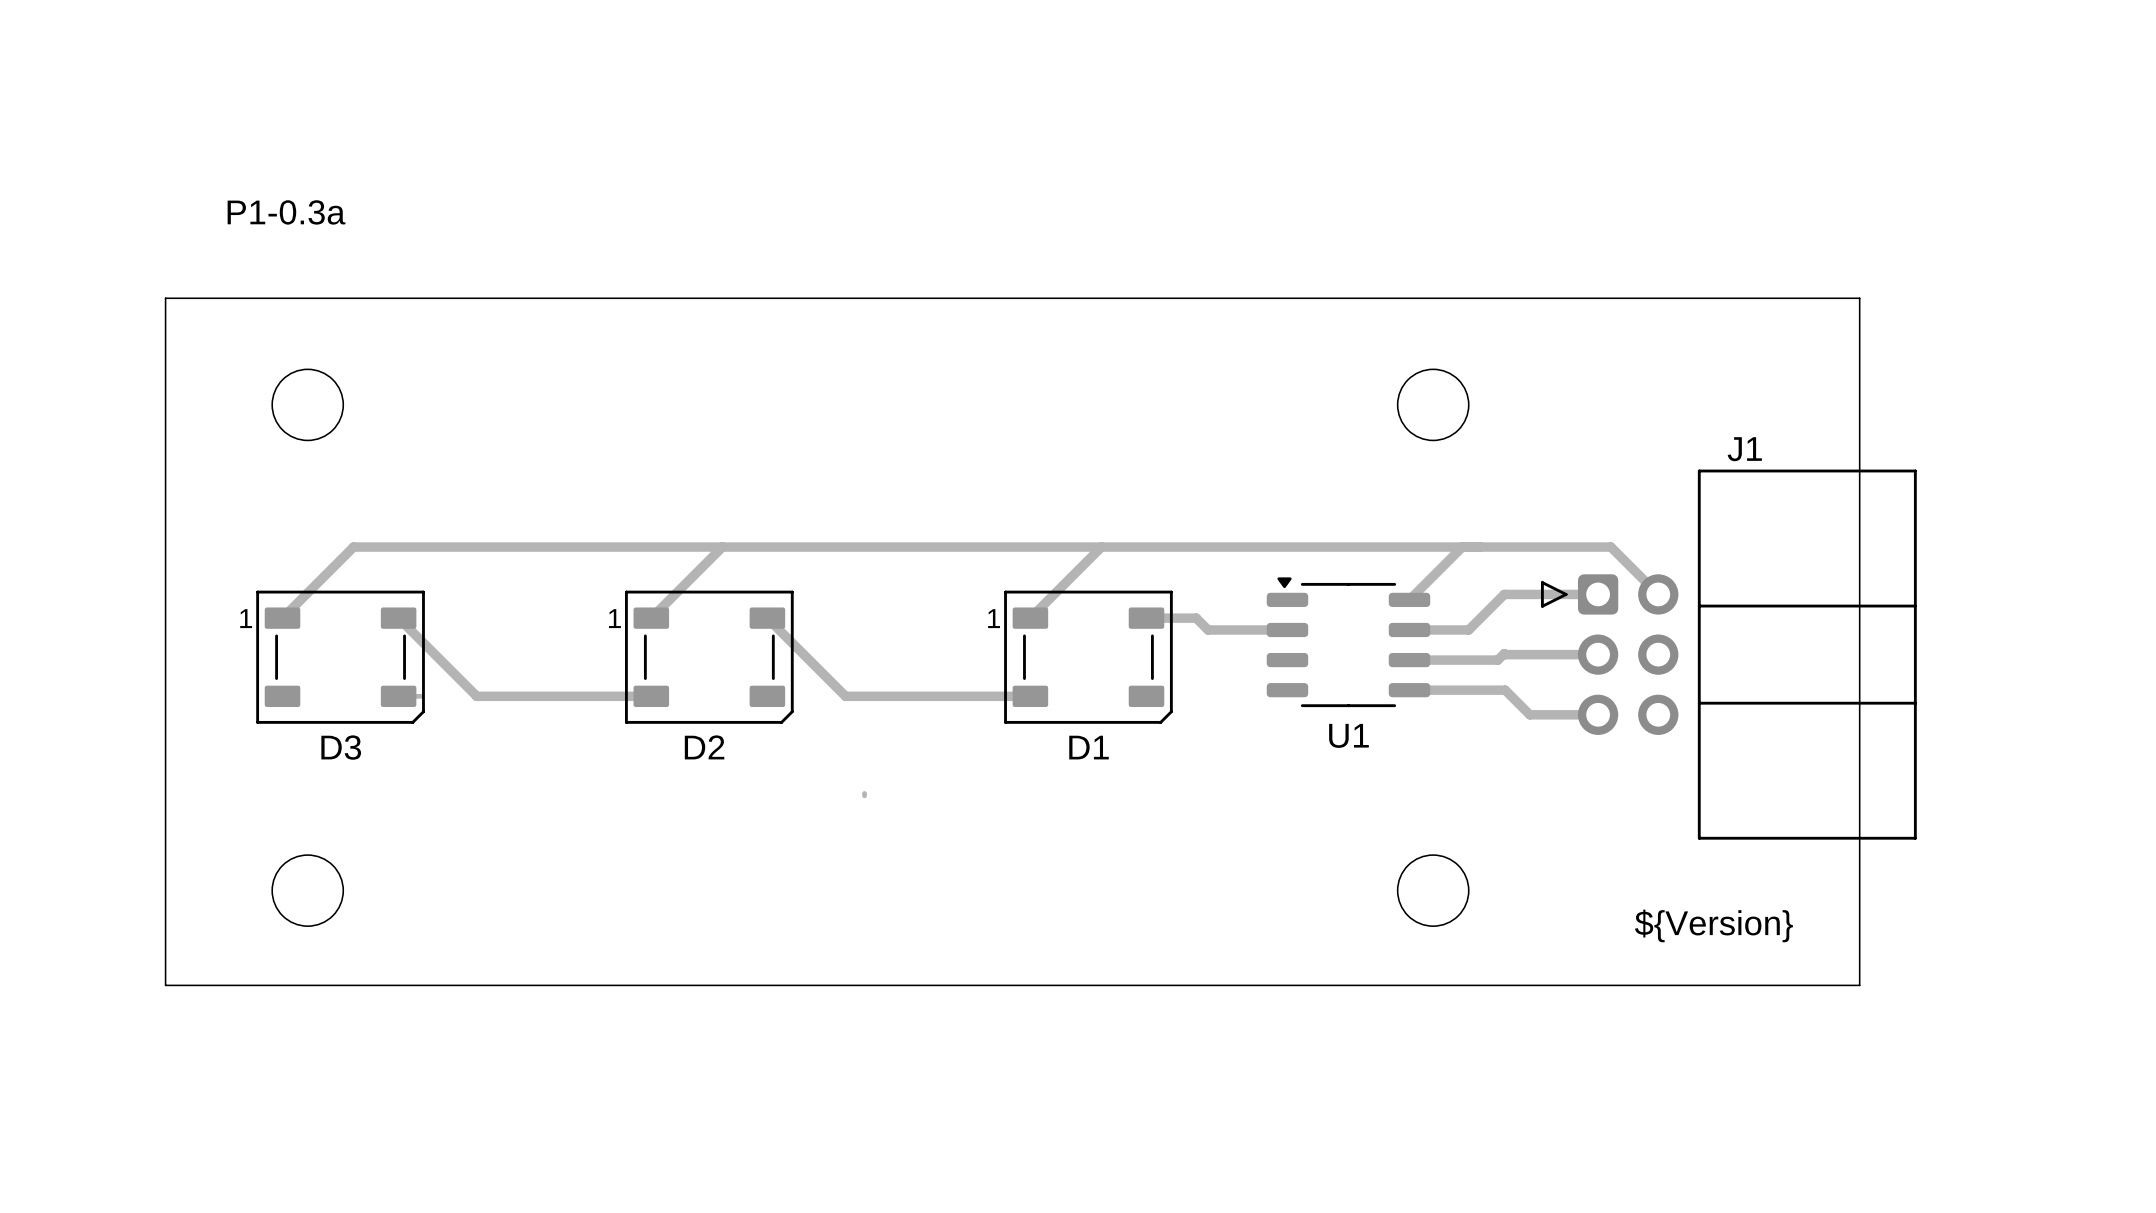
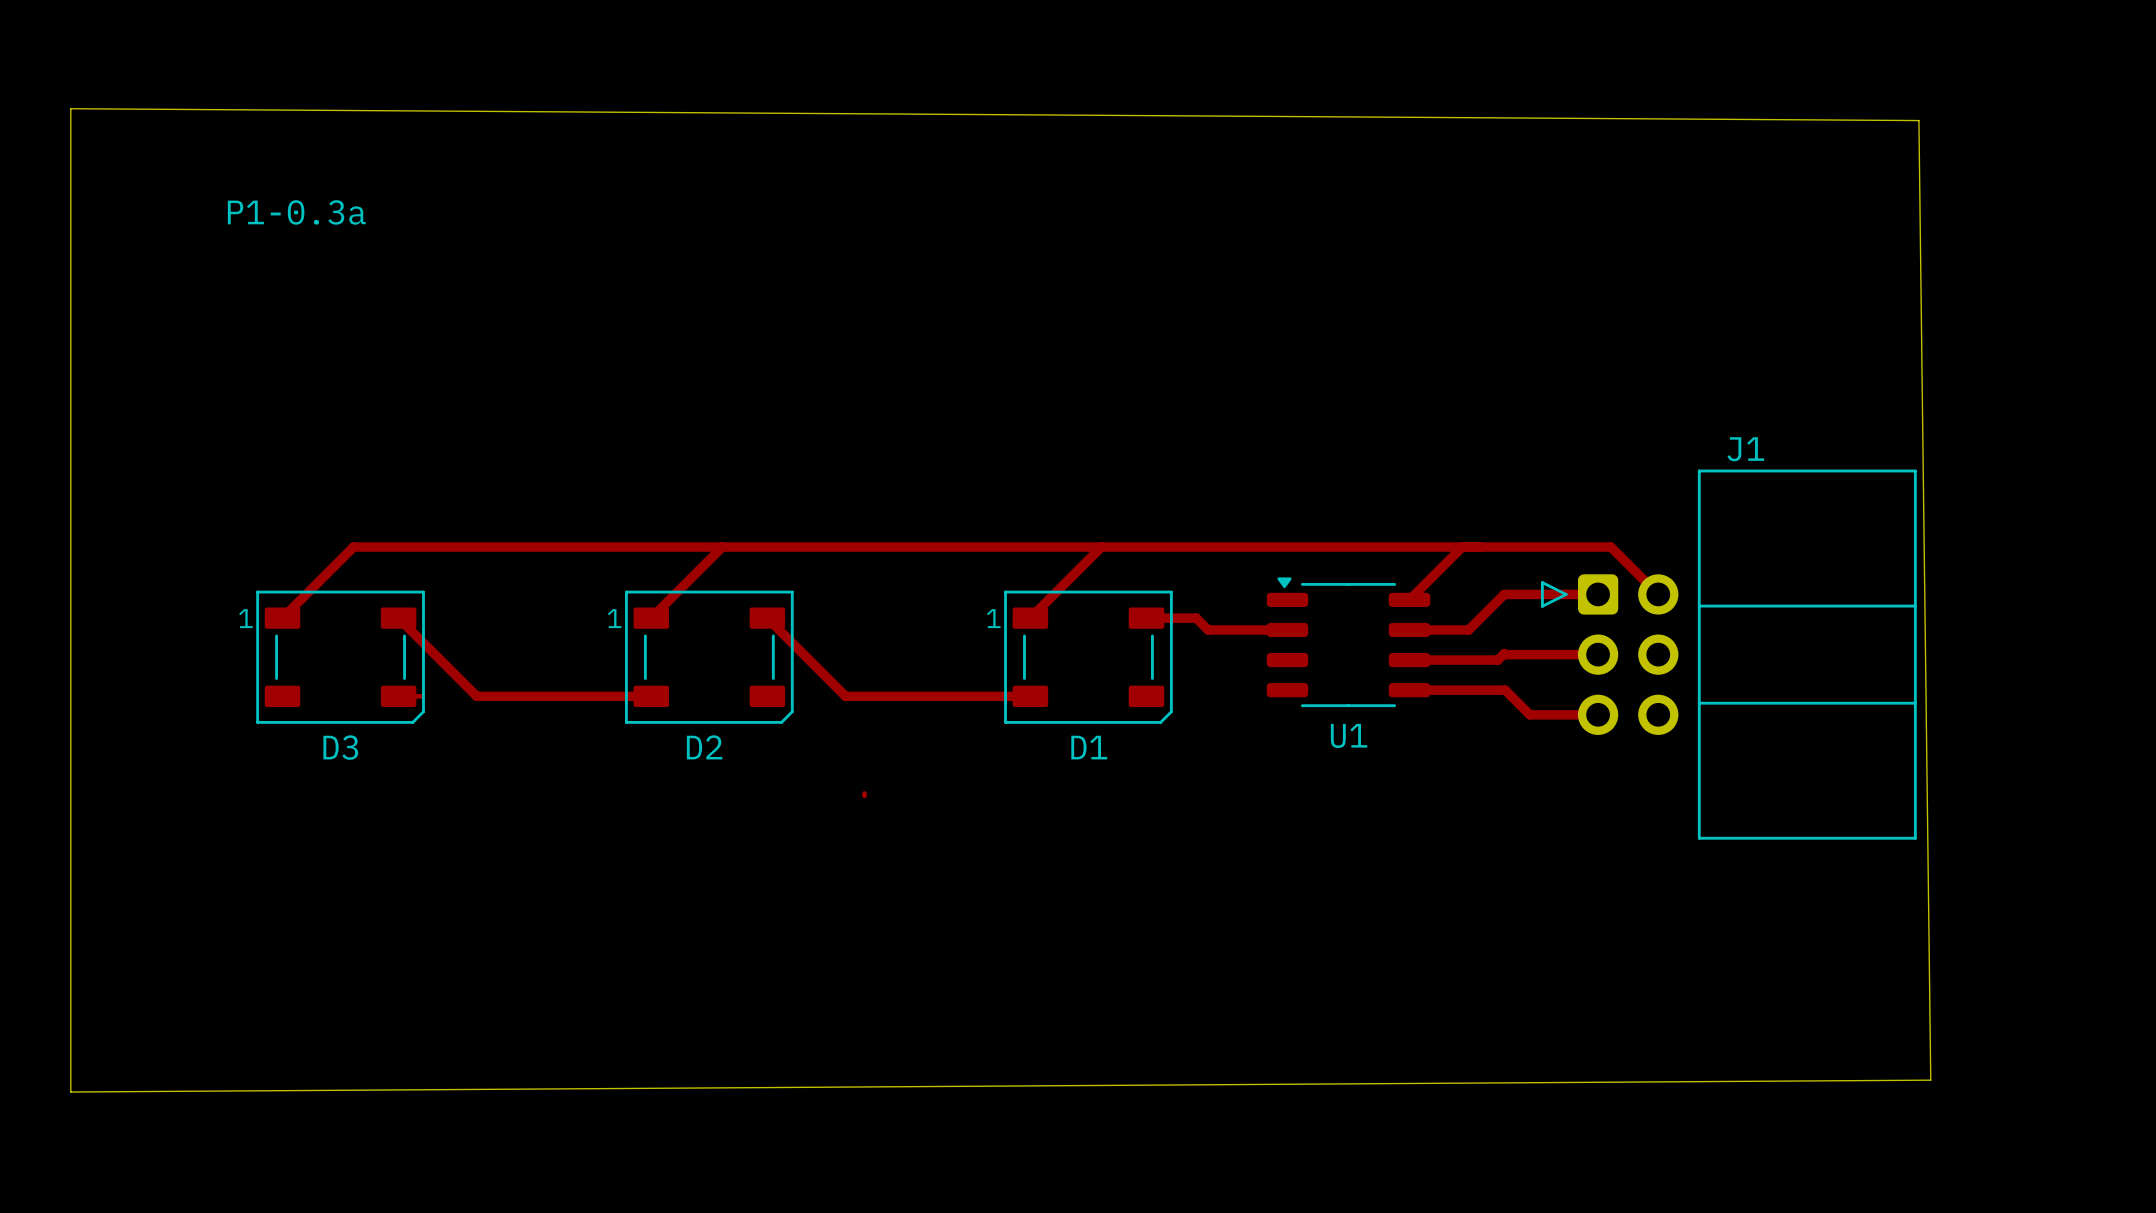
board edge: (165, 298) (1859, 298) (1859, 985) (165, 985) (165, 298) -> (70, 108) (70, 1092) (1930, 1080) (1918, 120) (70, 108)
round board edge: [271, 368, 344, 442] -> none
round board edge: [1397, 368, 1470, 442] -> none
round board edge: [271, 854, 344, 927] -> none
round board edge: [1397, 854, 1470, 927] -> none
text: ${Version} (1713, 925) -> none

